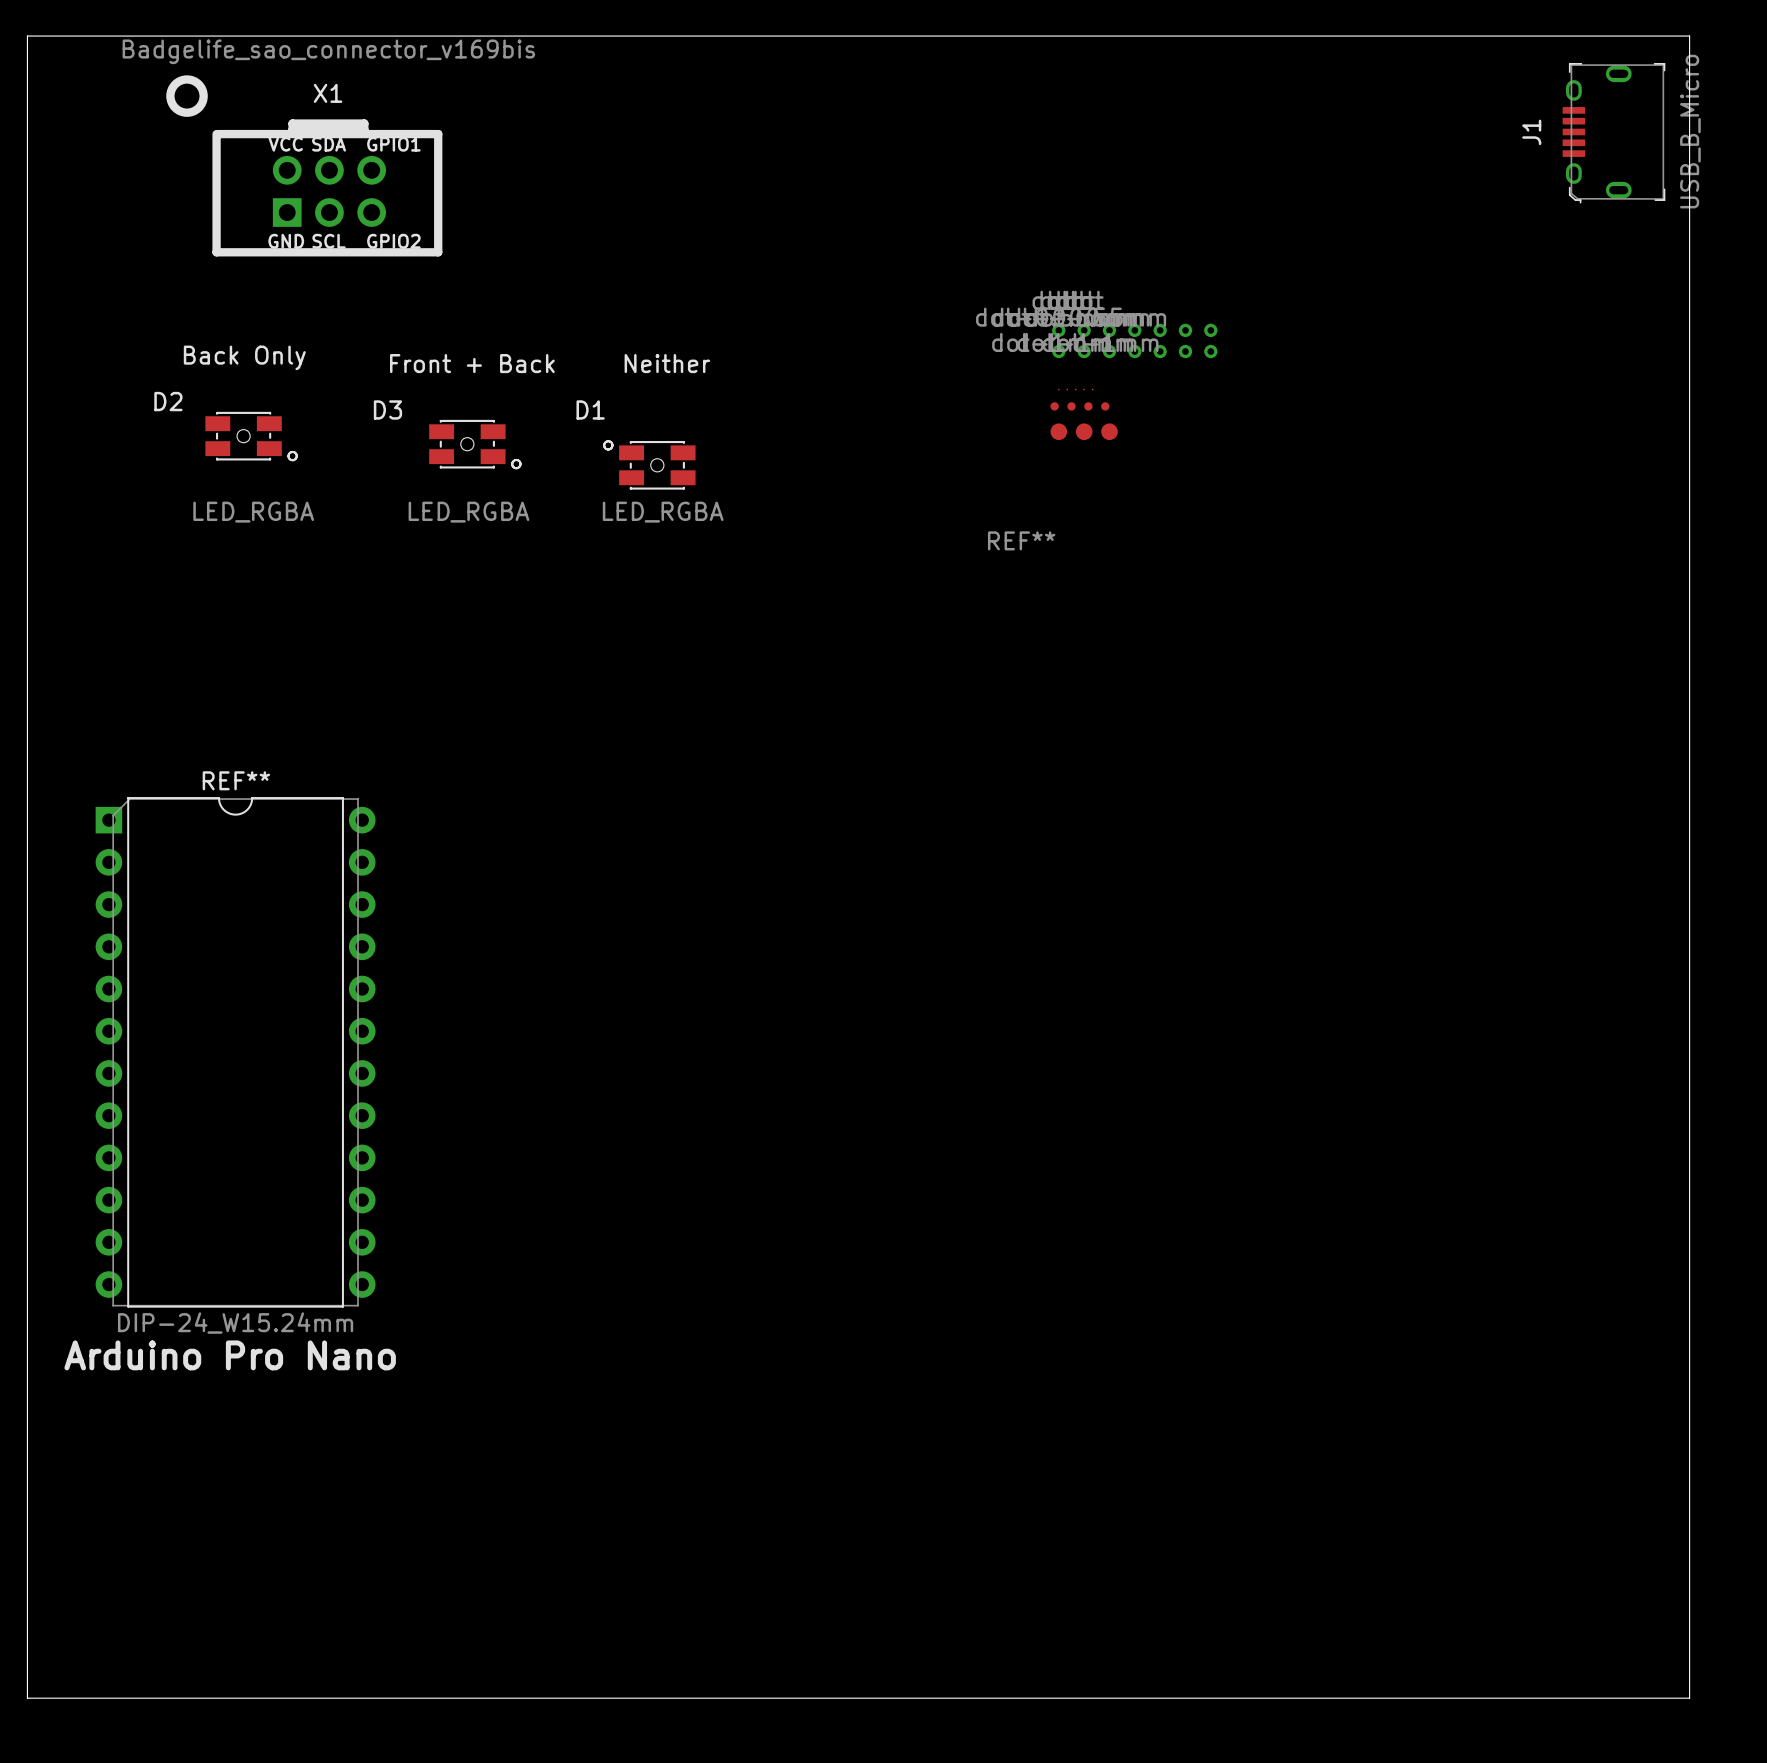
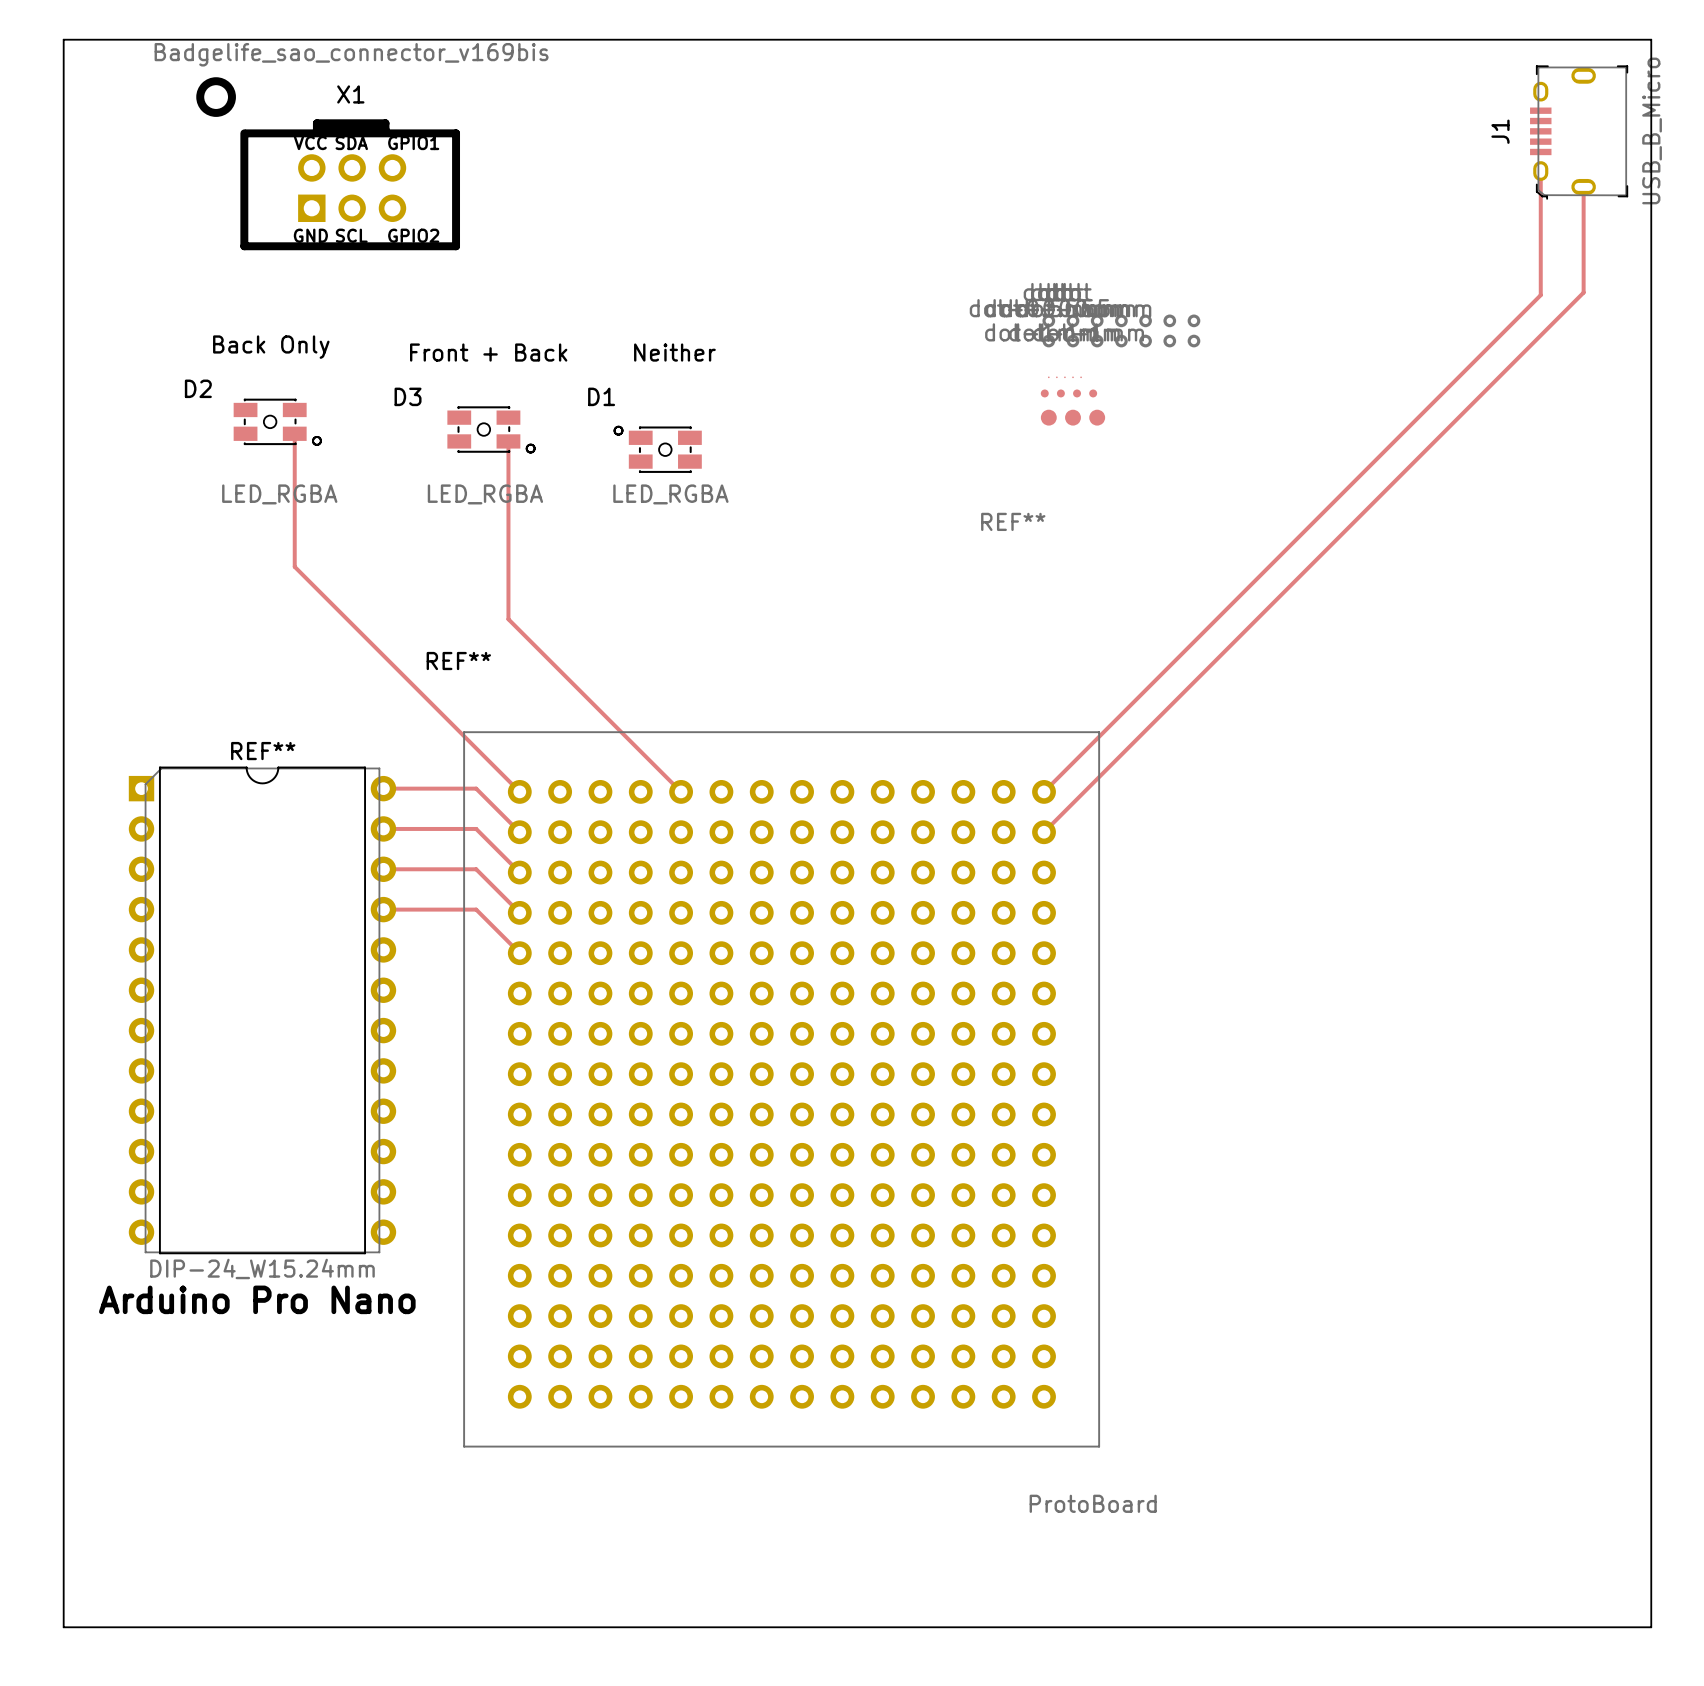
track: none -> (1540, 171) (1540, 295) (1044, 791)
track: none -> (1583, 186) (1583, 292) (1044, 832)
track: none -> (294, 433) (294, 566) (519, 791)
track: none -> (508, 441) (508, 619) (681, 791)
track: none -> (383, 788) (476, 788) (519, 832)
track: none -> (383, 828) (476, 828) (519, 872)
track: none -> (383, 869) (476, 869) (519, 912)
track: none -> (383, 909) (476, 909) (519, 953)
REF**: none -> ProtoBoard (781, 1089)

